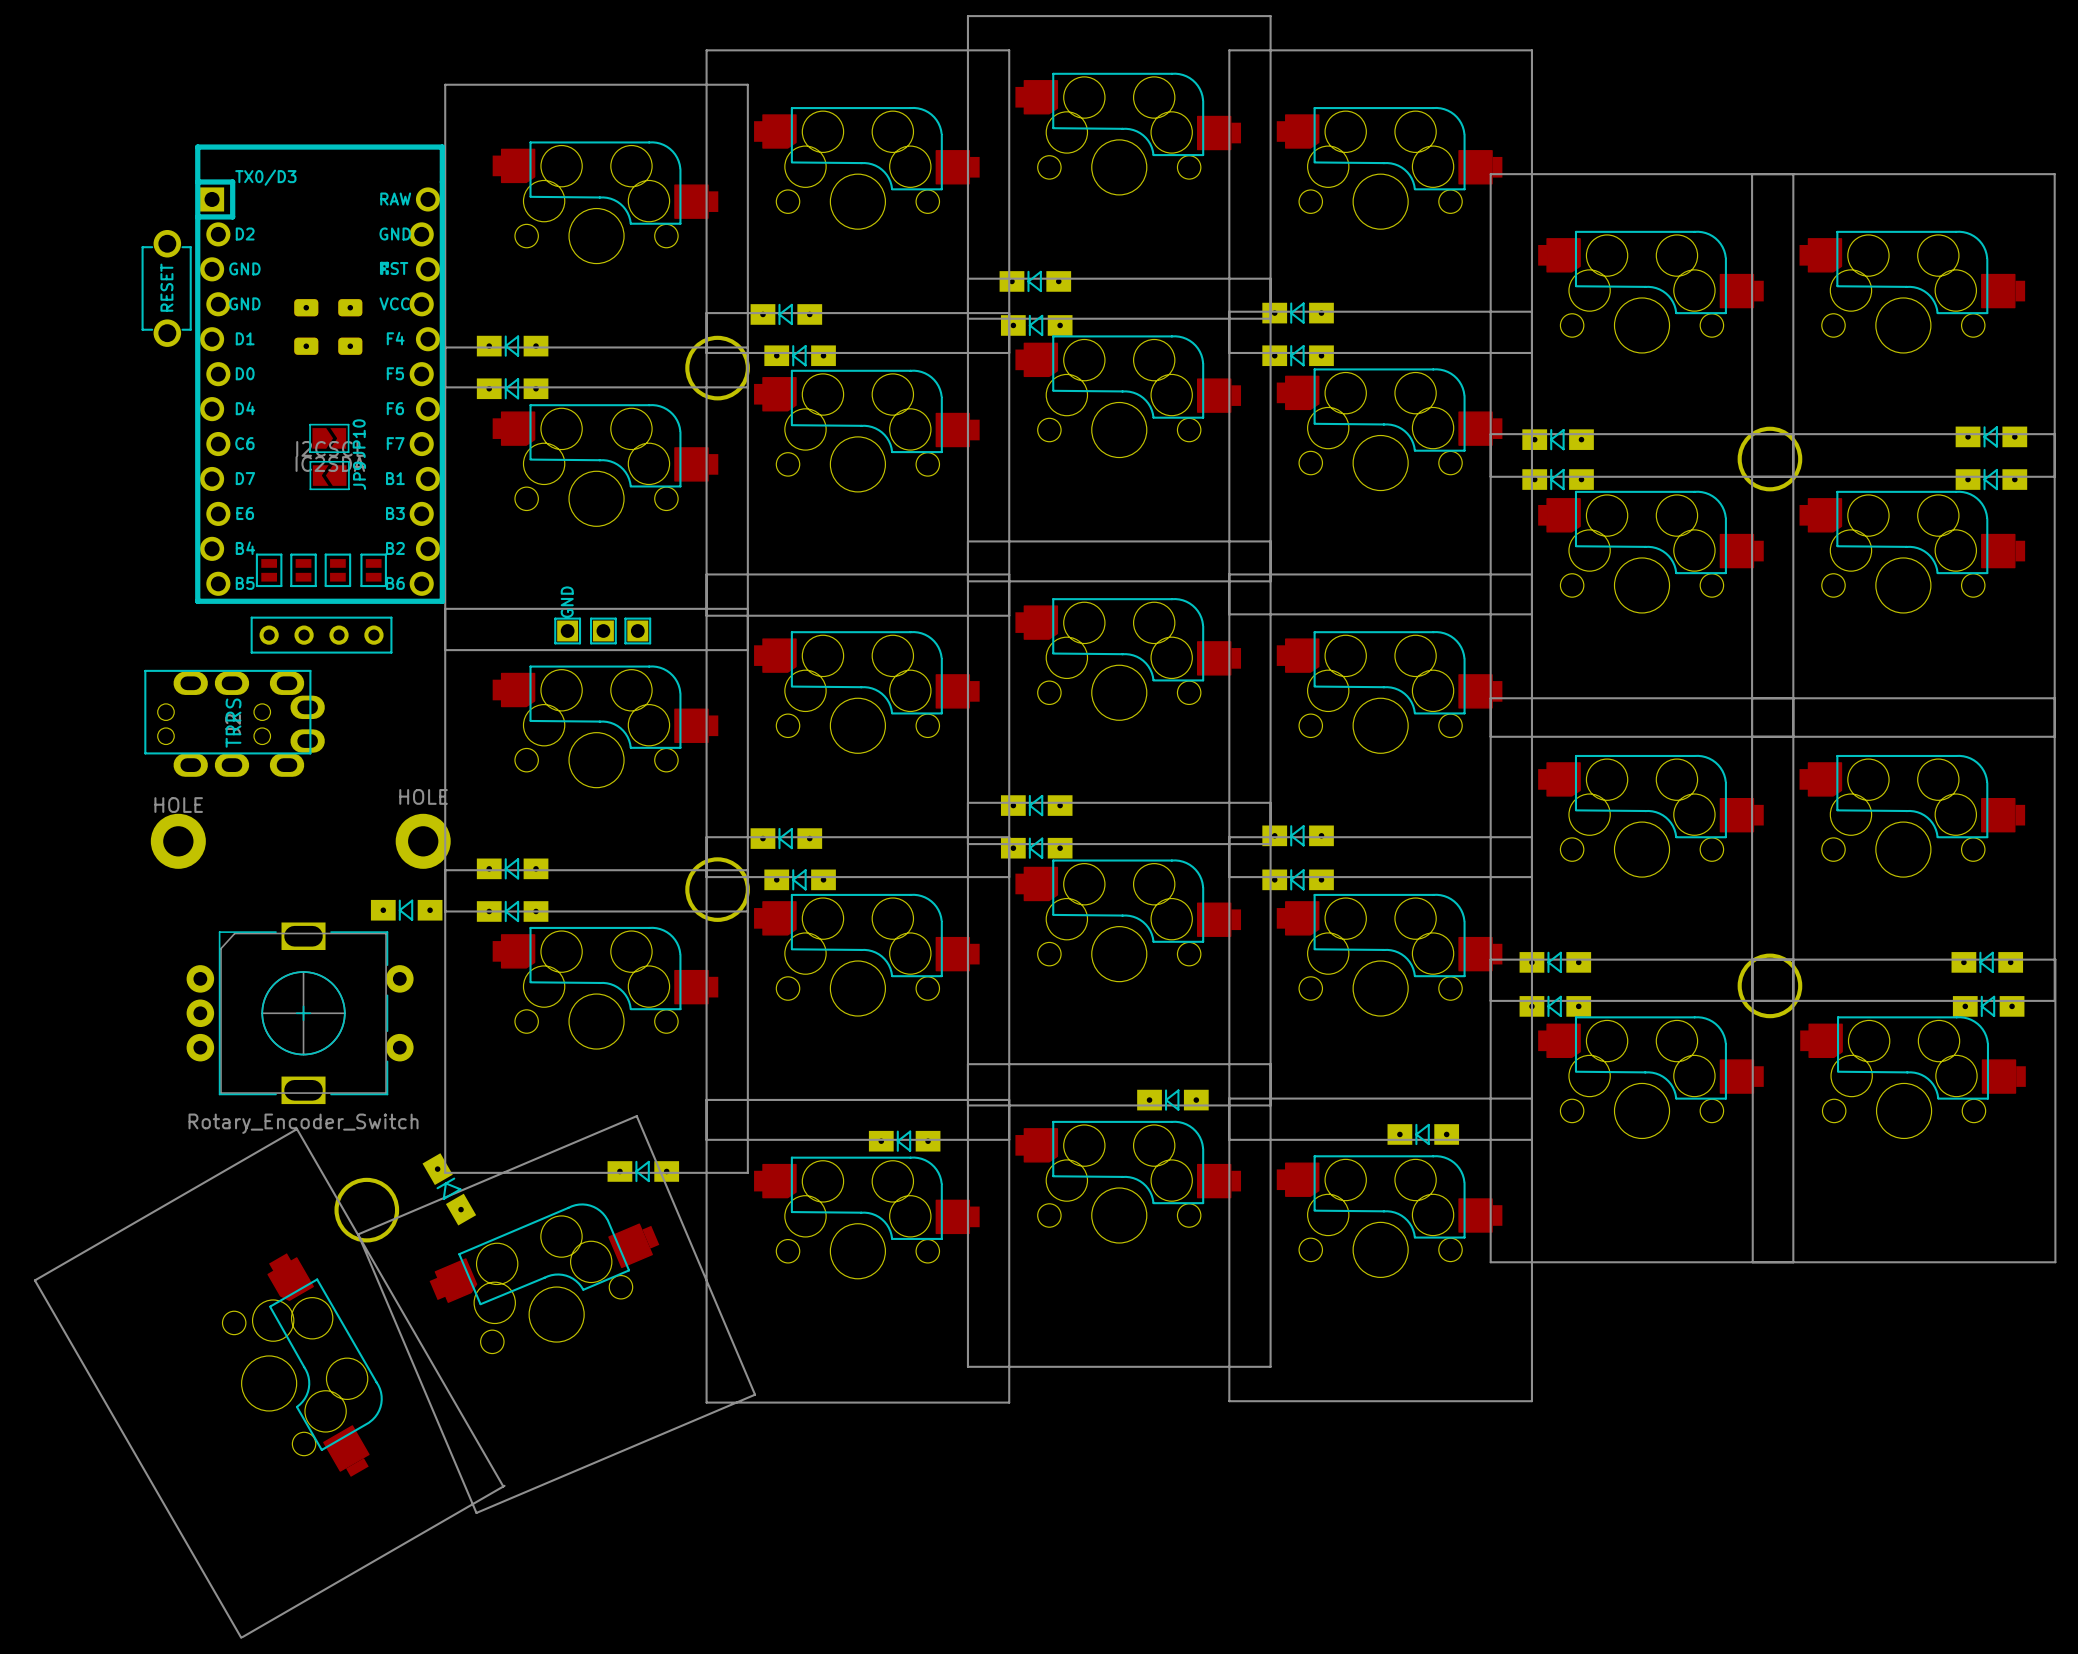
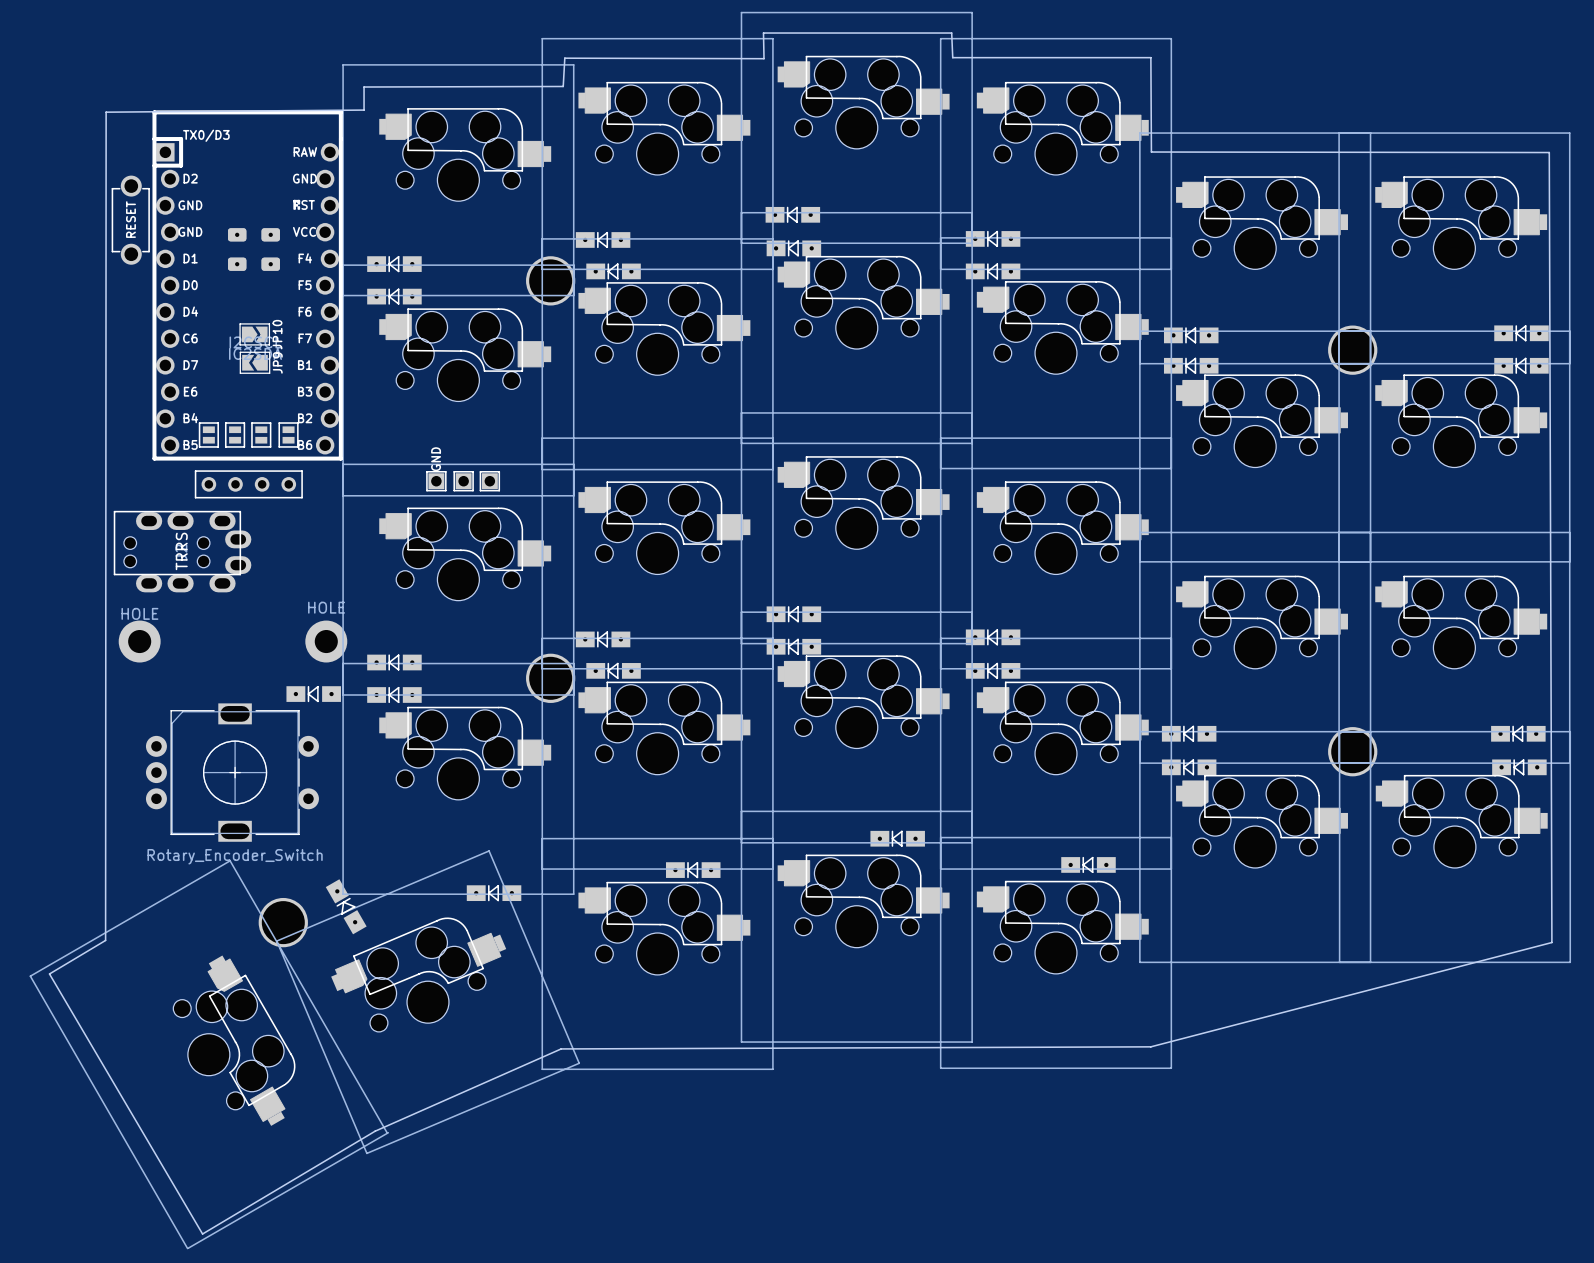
board edge: none -> (763, 33) (764, 58) (564, 58) (563, 86) (364, 87) (364, 110) (106, 112) (105, 940) (49, 973) (202, 1233) (375, 1131) (561, 1048) (1150, 1046) (1551, 942) (1549, 152) (1151, 152) (1150, 57) (952, 57) (951, 33) (763, 33)

